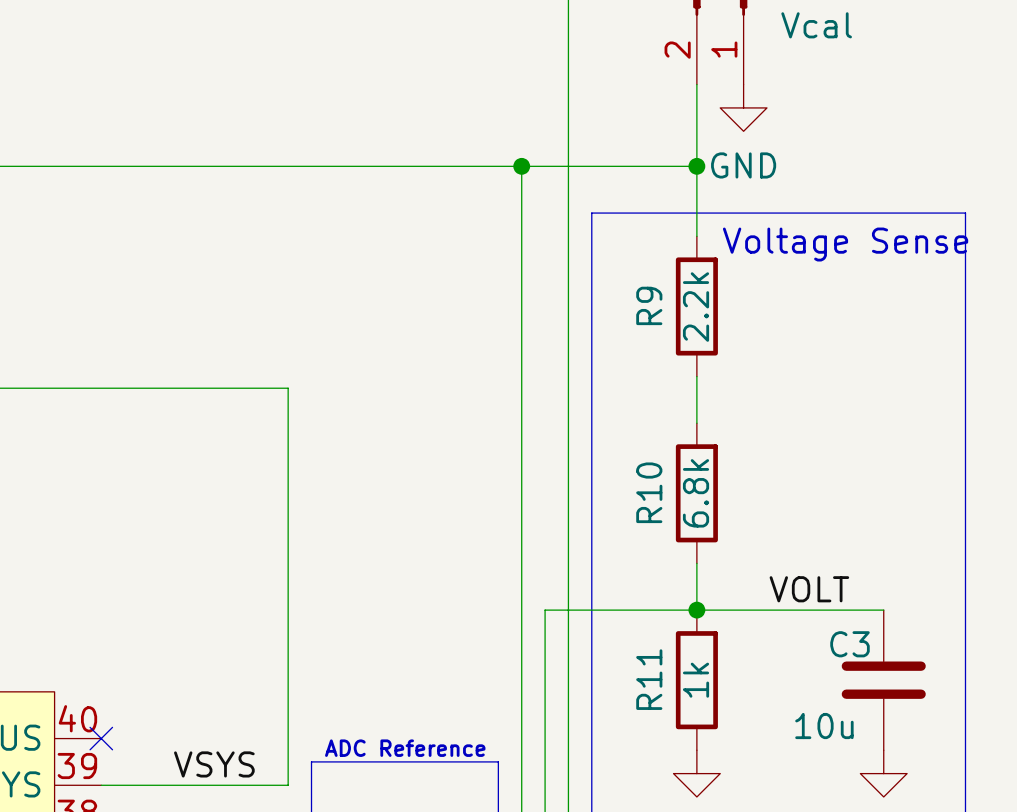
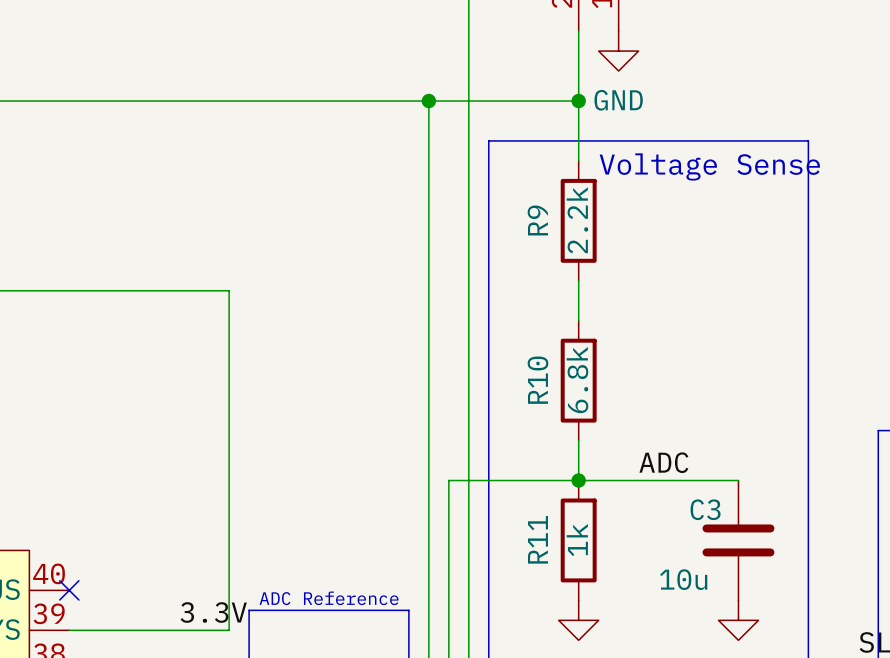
label: VOLT (809, 589) -> ADC (663, 462)
label: VSYS (214, 764) -> none
label: none -> 3.3V (213, 612)

